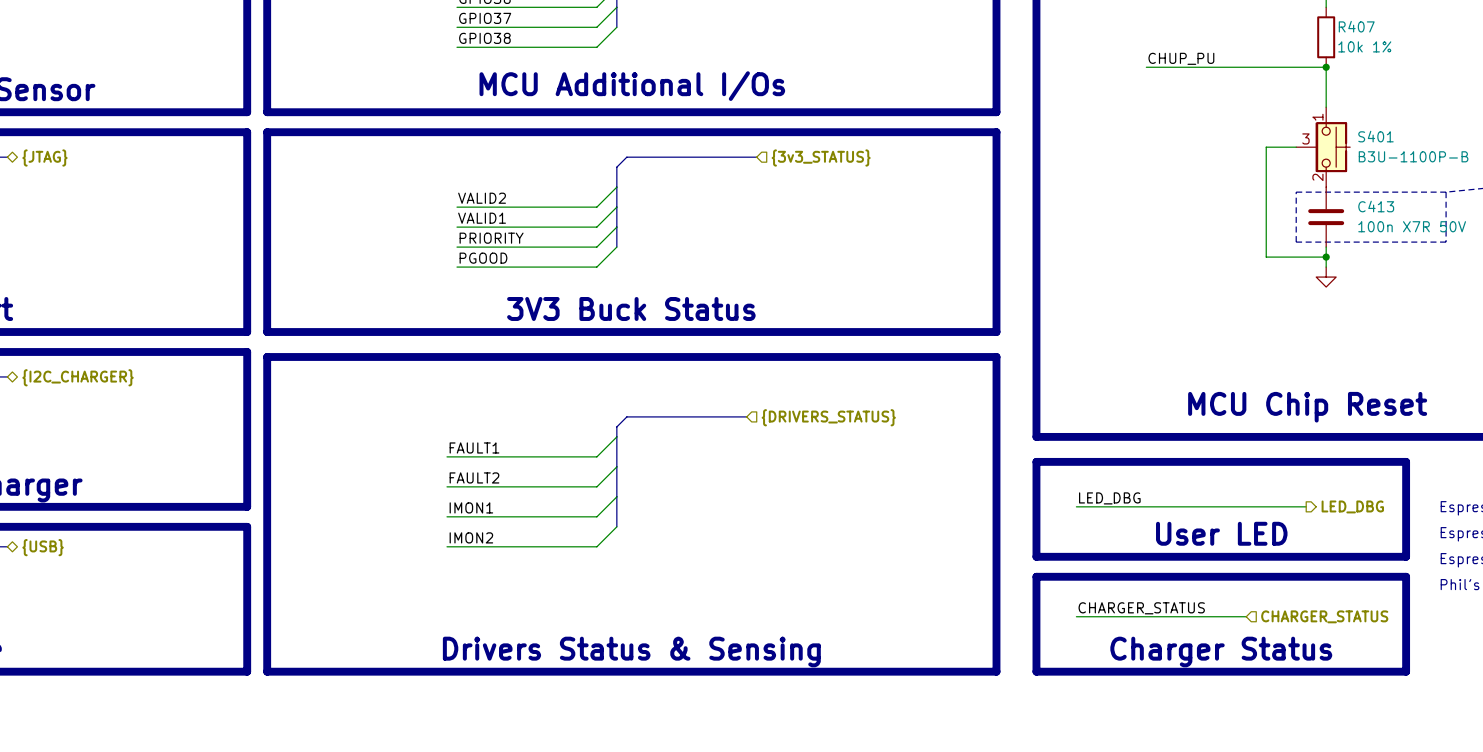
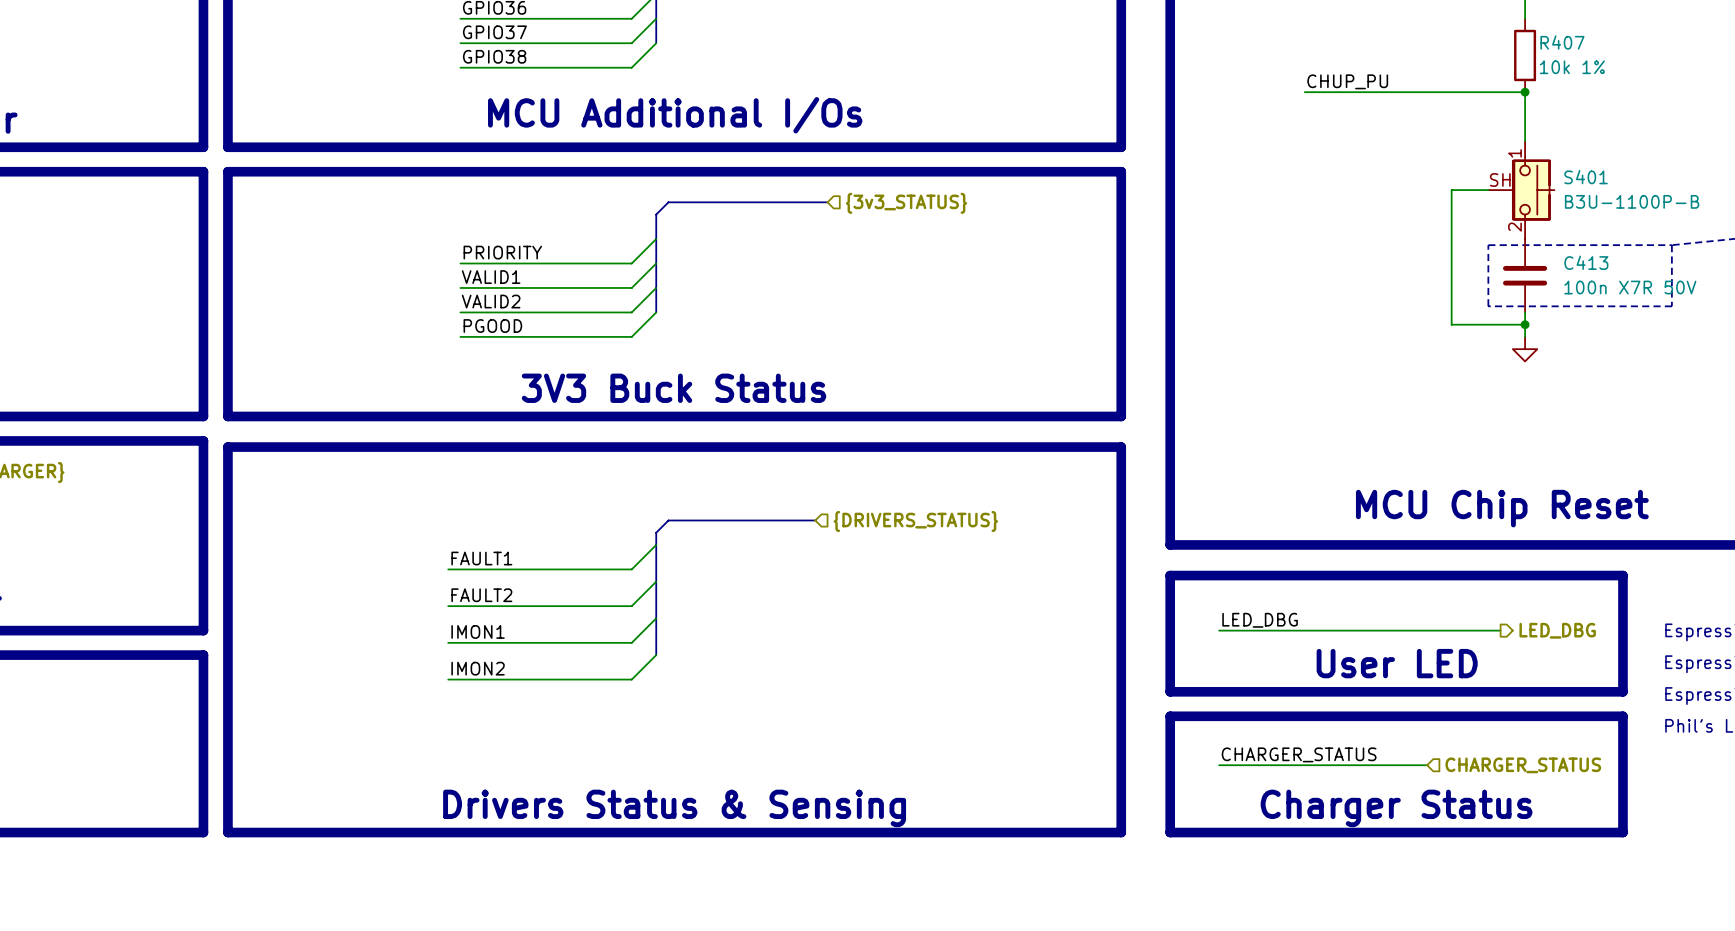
S401 pin number: 3 (1305, 138) -> SH (1500, 179)
label: VALID2 (482, 198) -> PRIORITY (502, 252)
label: PRIORITY (491, 238) -> VALID2 (491, 301)

